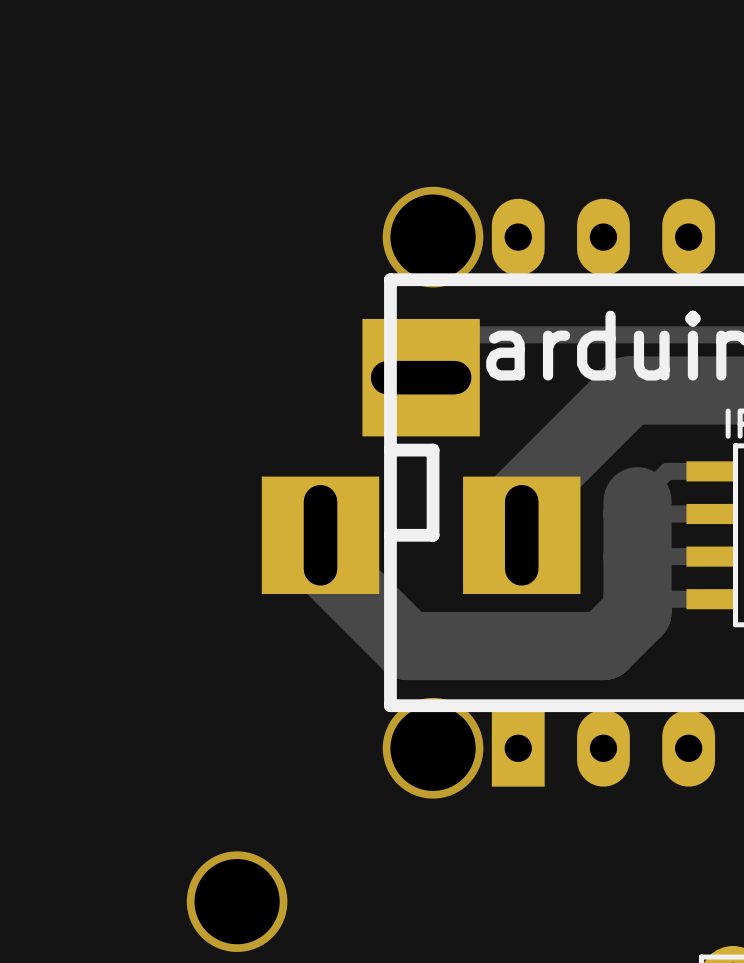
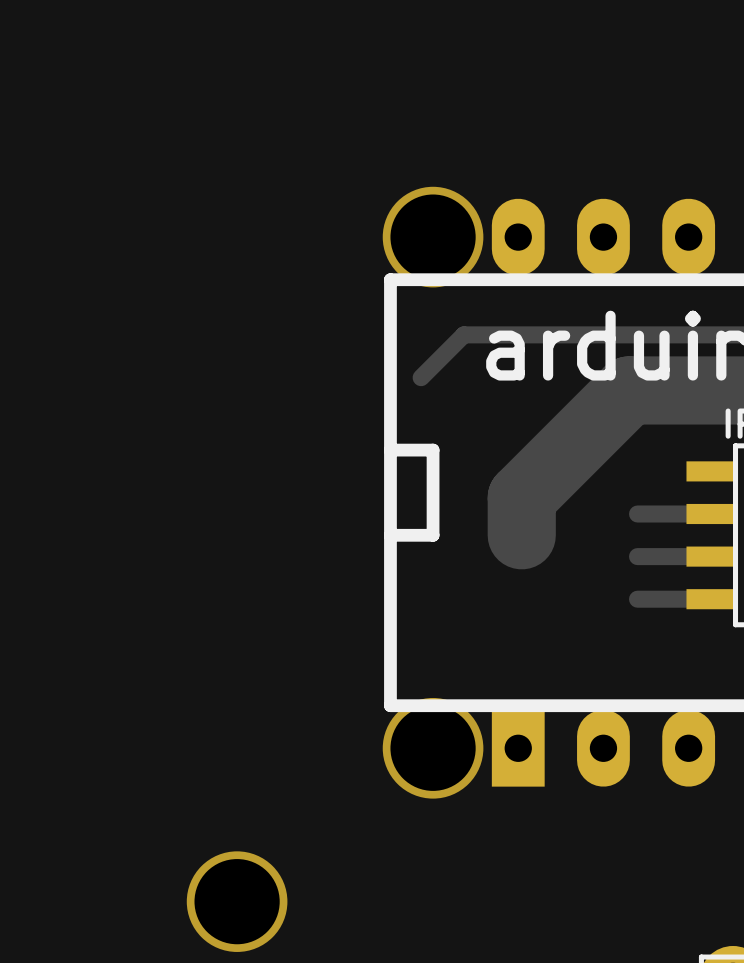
part: (421, 456) -> none
track: (709, 471) (667, 471) (637, 501) (637, 611) (603, 646) (407, 646) (320, 559) (320, 535) -> none

